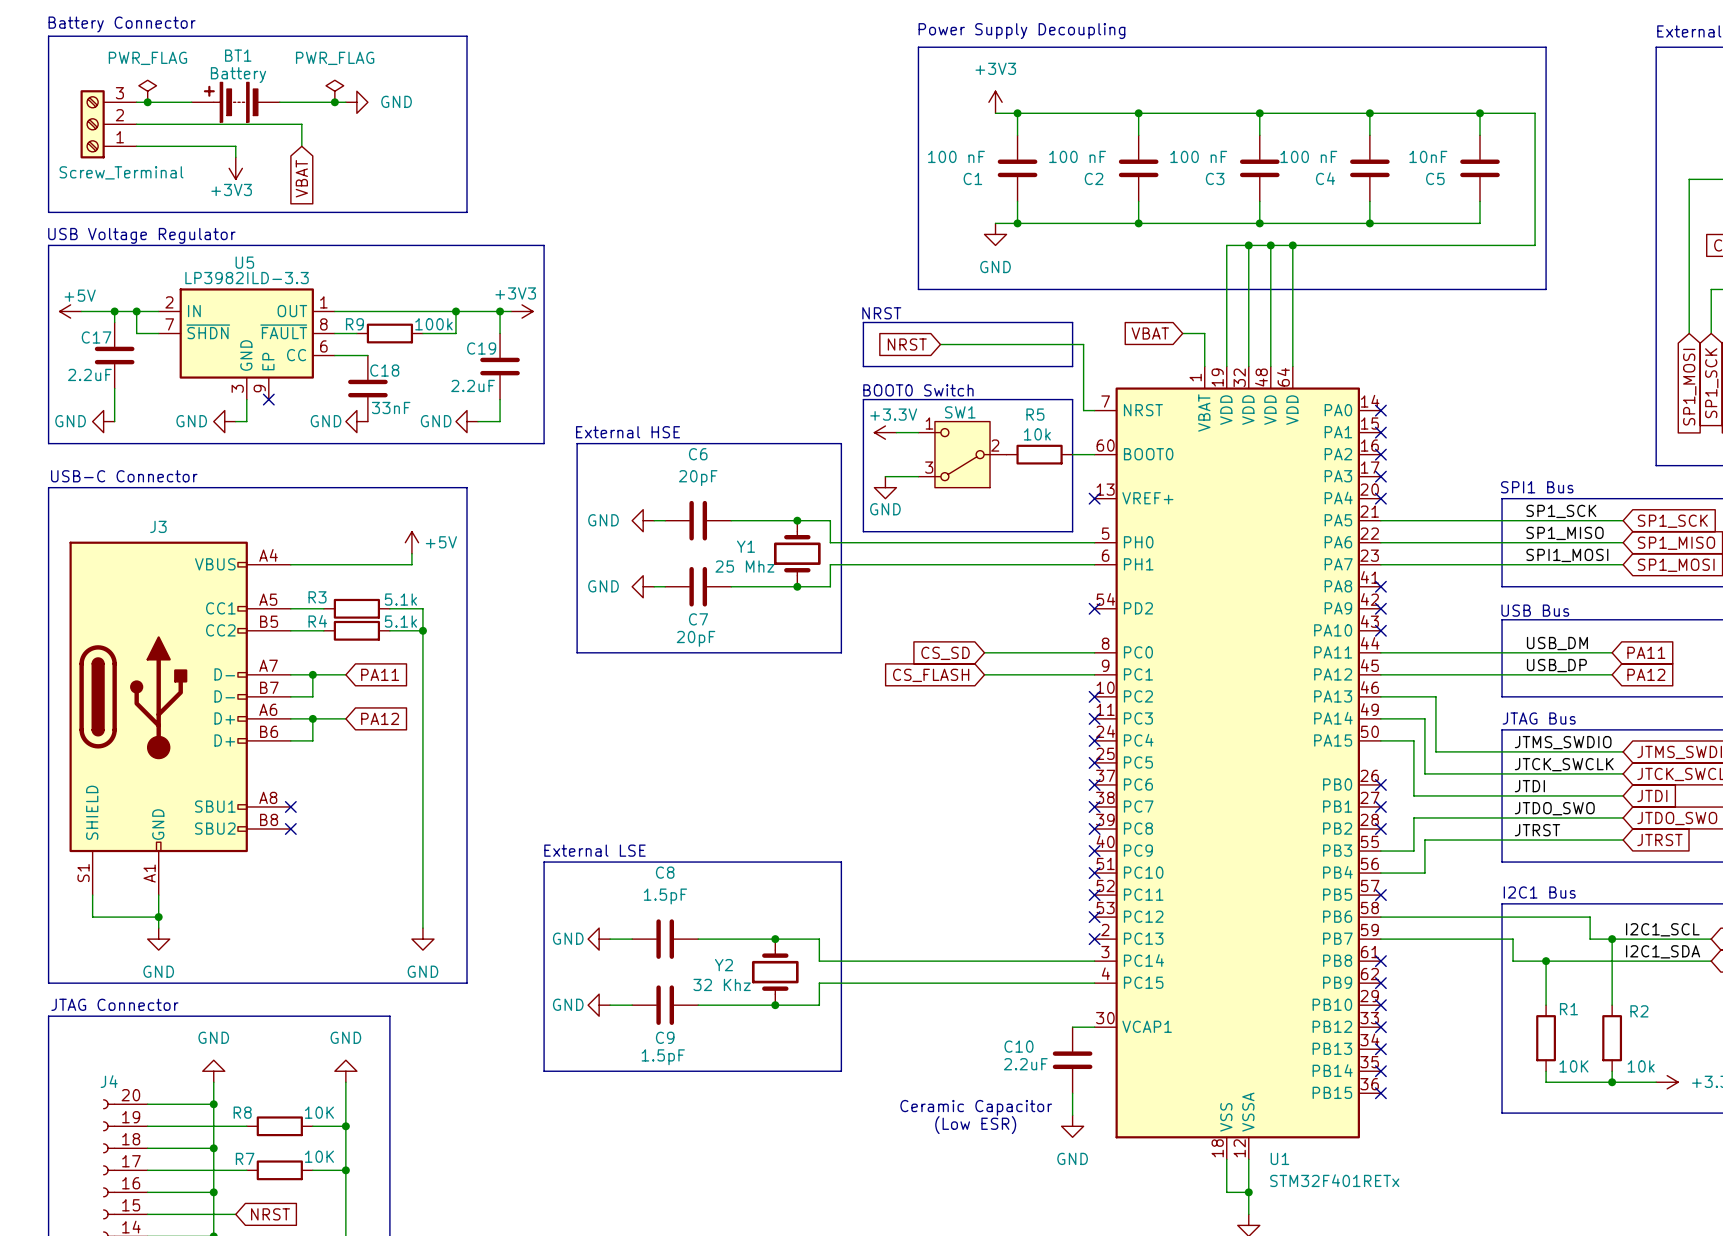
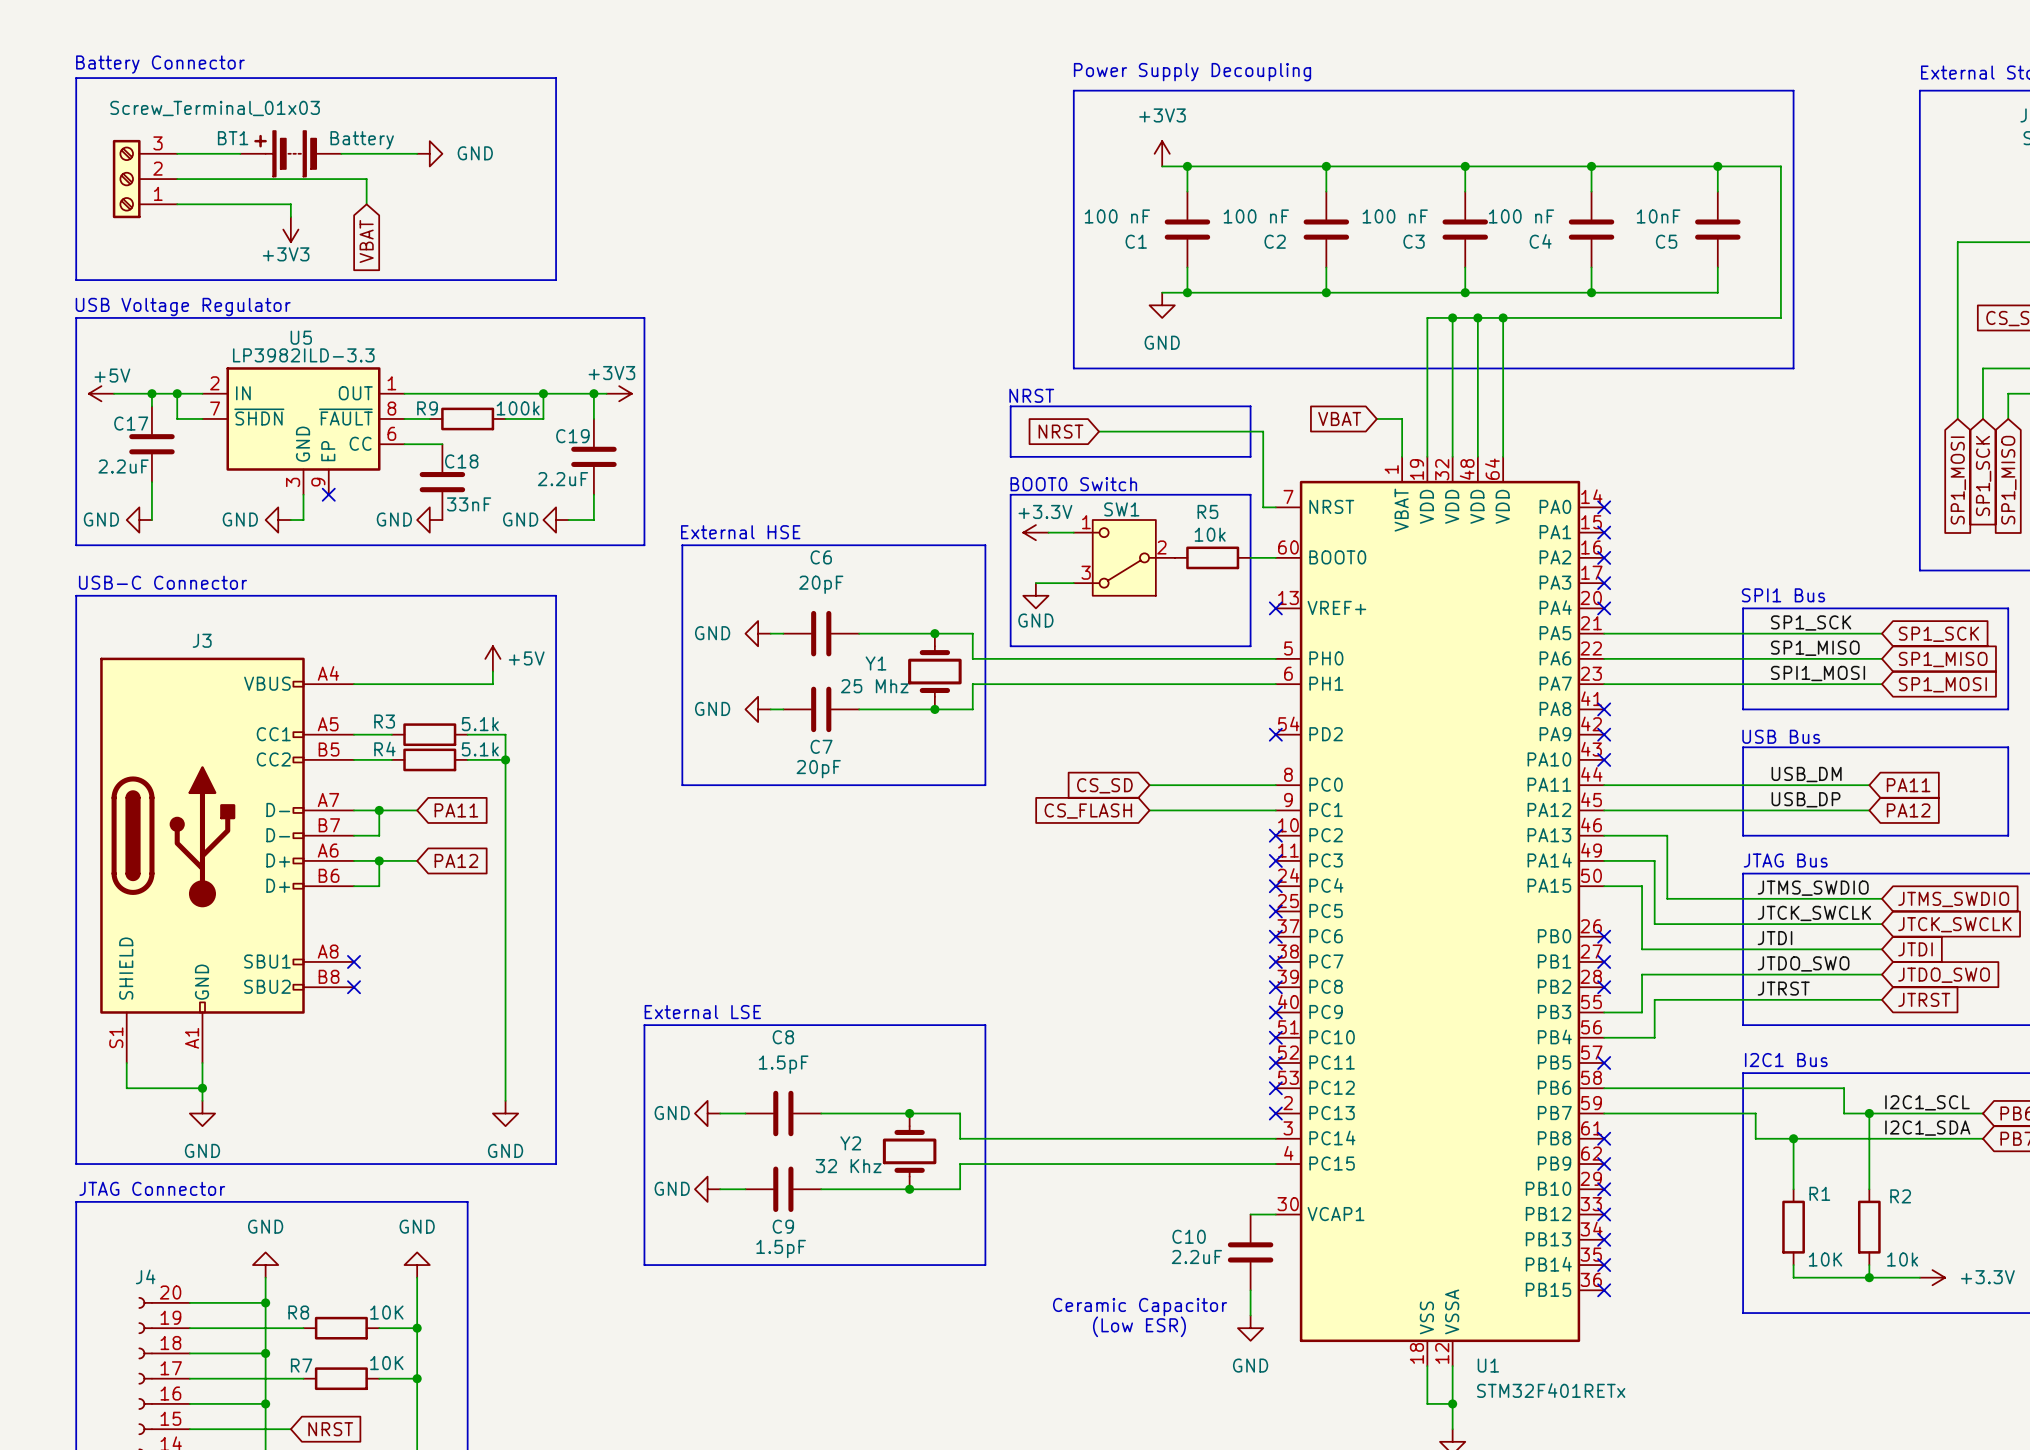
BT1 name position: BT1 (238, 55) -> BT1 (233, 138)
BT1 value position: Battery (238, 75) -> Battery (362, 140)
power symbol: PWR_FLAG (147, 91) -> none
power symbol: PWR_FLAG (334, 91) -> none
junction: (147, 102) -> none
junction: (334, 102) -> none
part value: Screw_Terminal (121, 172) -> Screw_Terminal_01x03 (215, 108)

